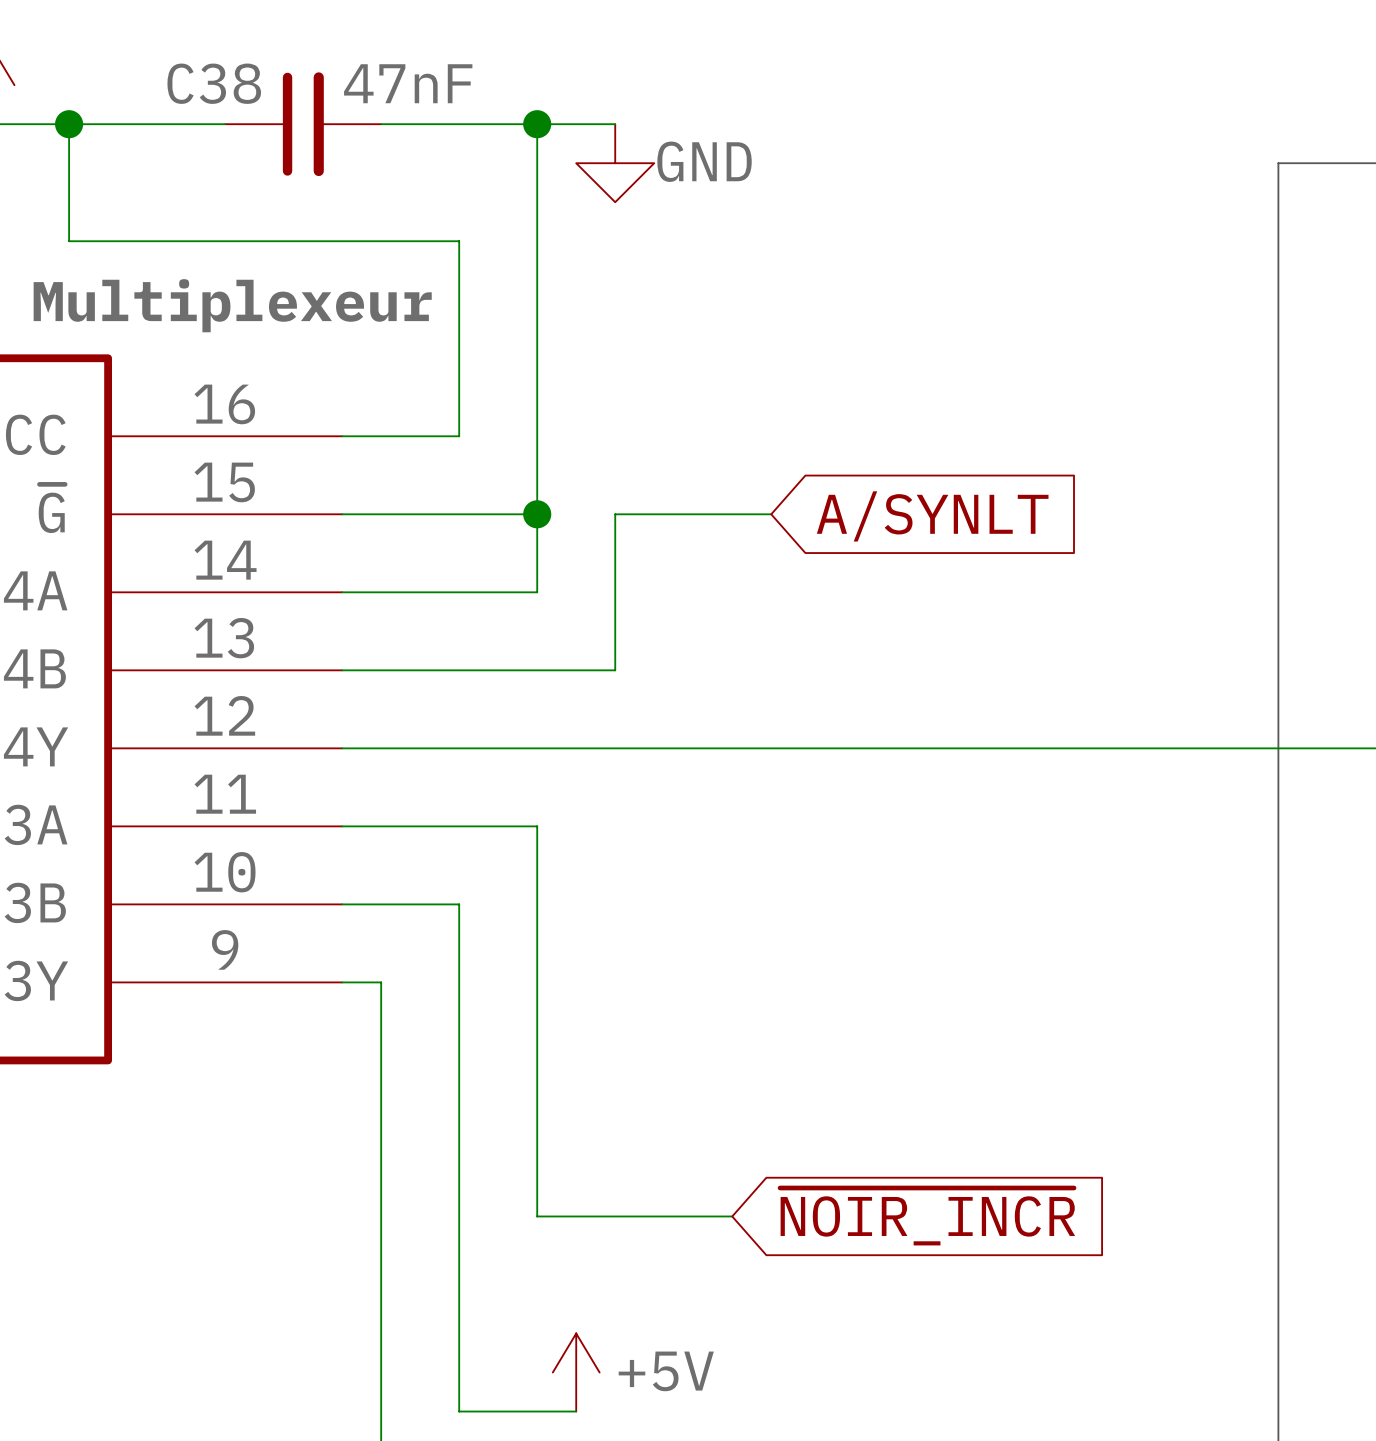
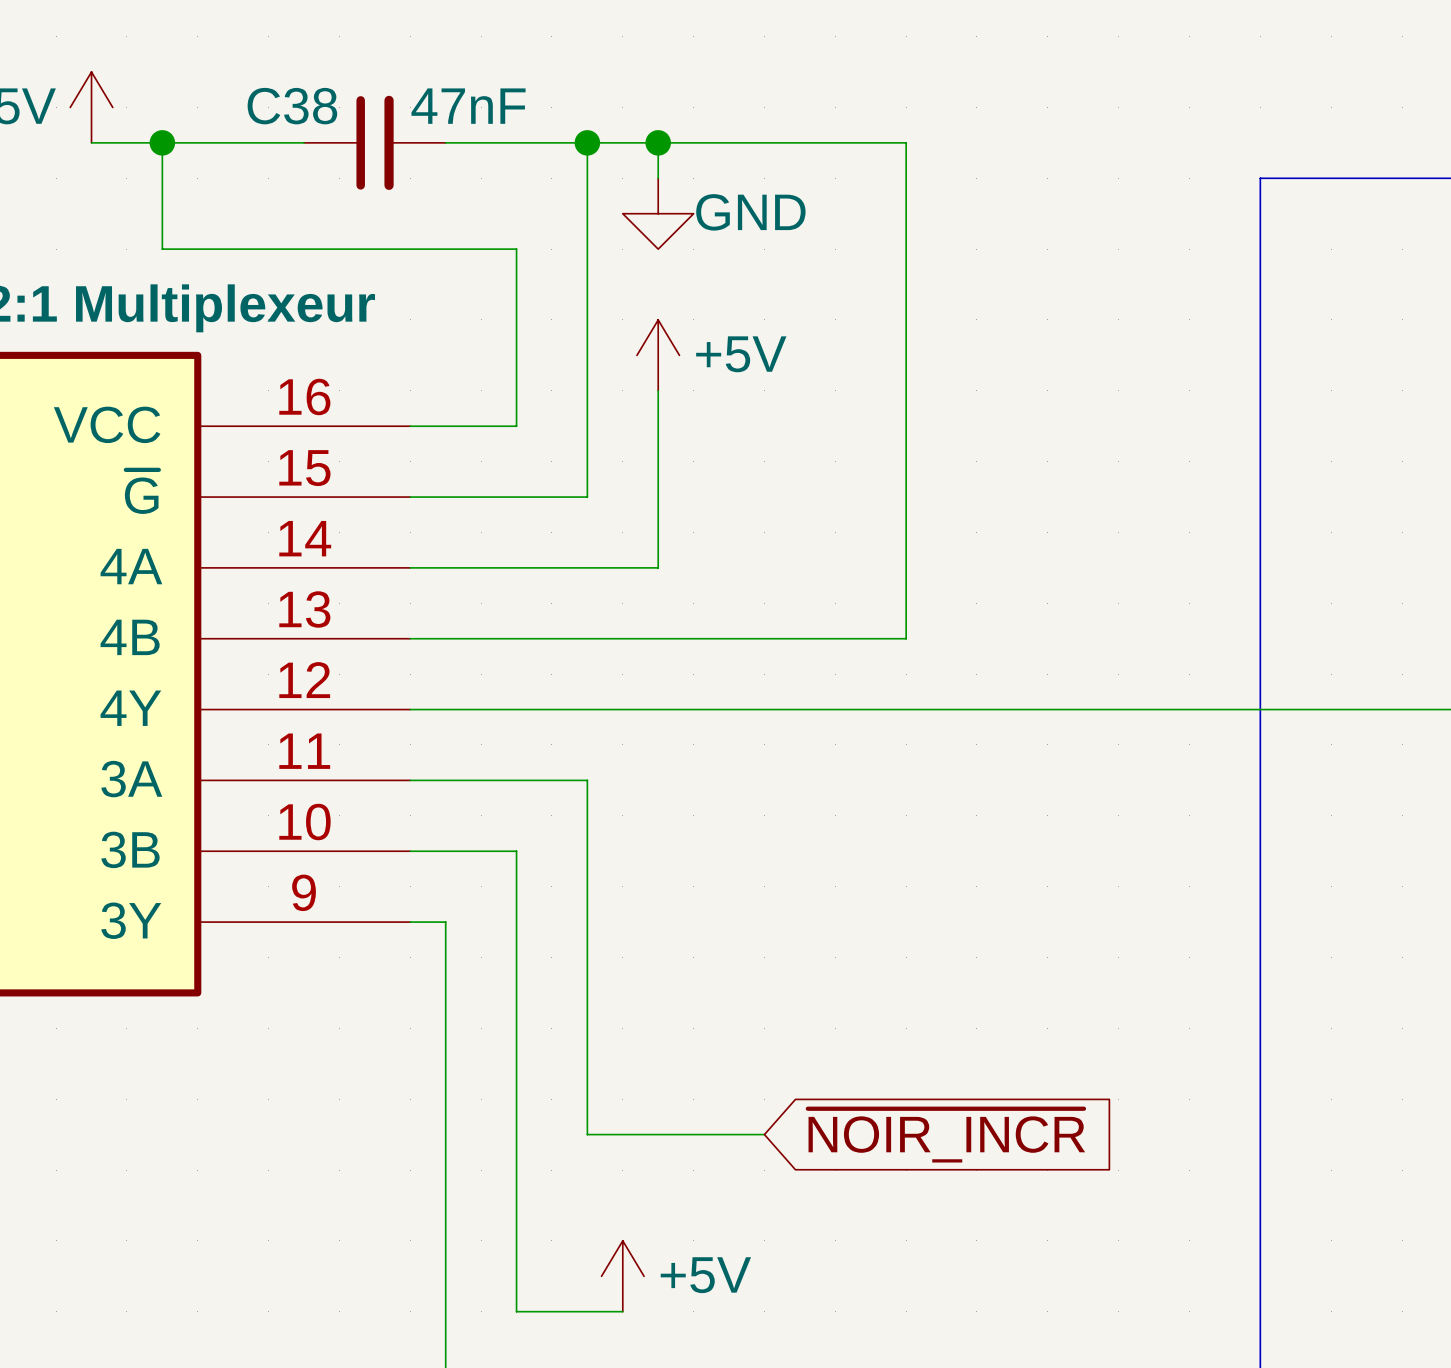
junction: none -> (658, 142)
power symbol position: GND (615, 163) -> GND (658, 213)
power symbol: none -> +5V (658, 355)
wire: (537, 514) (537, 592) -> (658, 567) (587, 567)
junction: (537, 514) -> none
wire: (615, 514) (771, 514) -> (658, 497) (658, 390)
global label: A/SYNLT (932, 516) -> none
wire: (615, 592) (615, 670) -> (658, 178) (658, 142) (906, 142) (906, 638) (658, 638)

